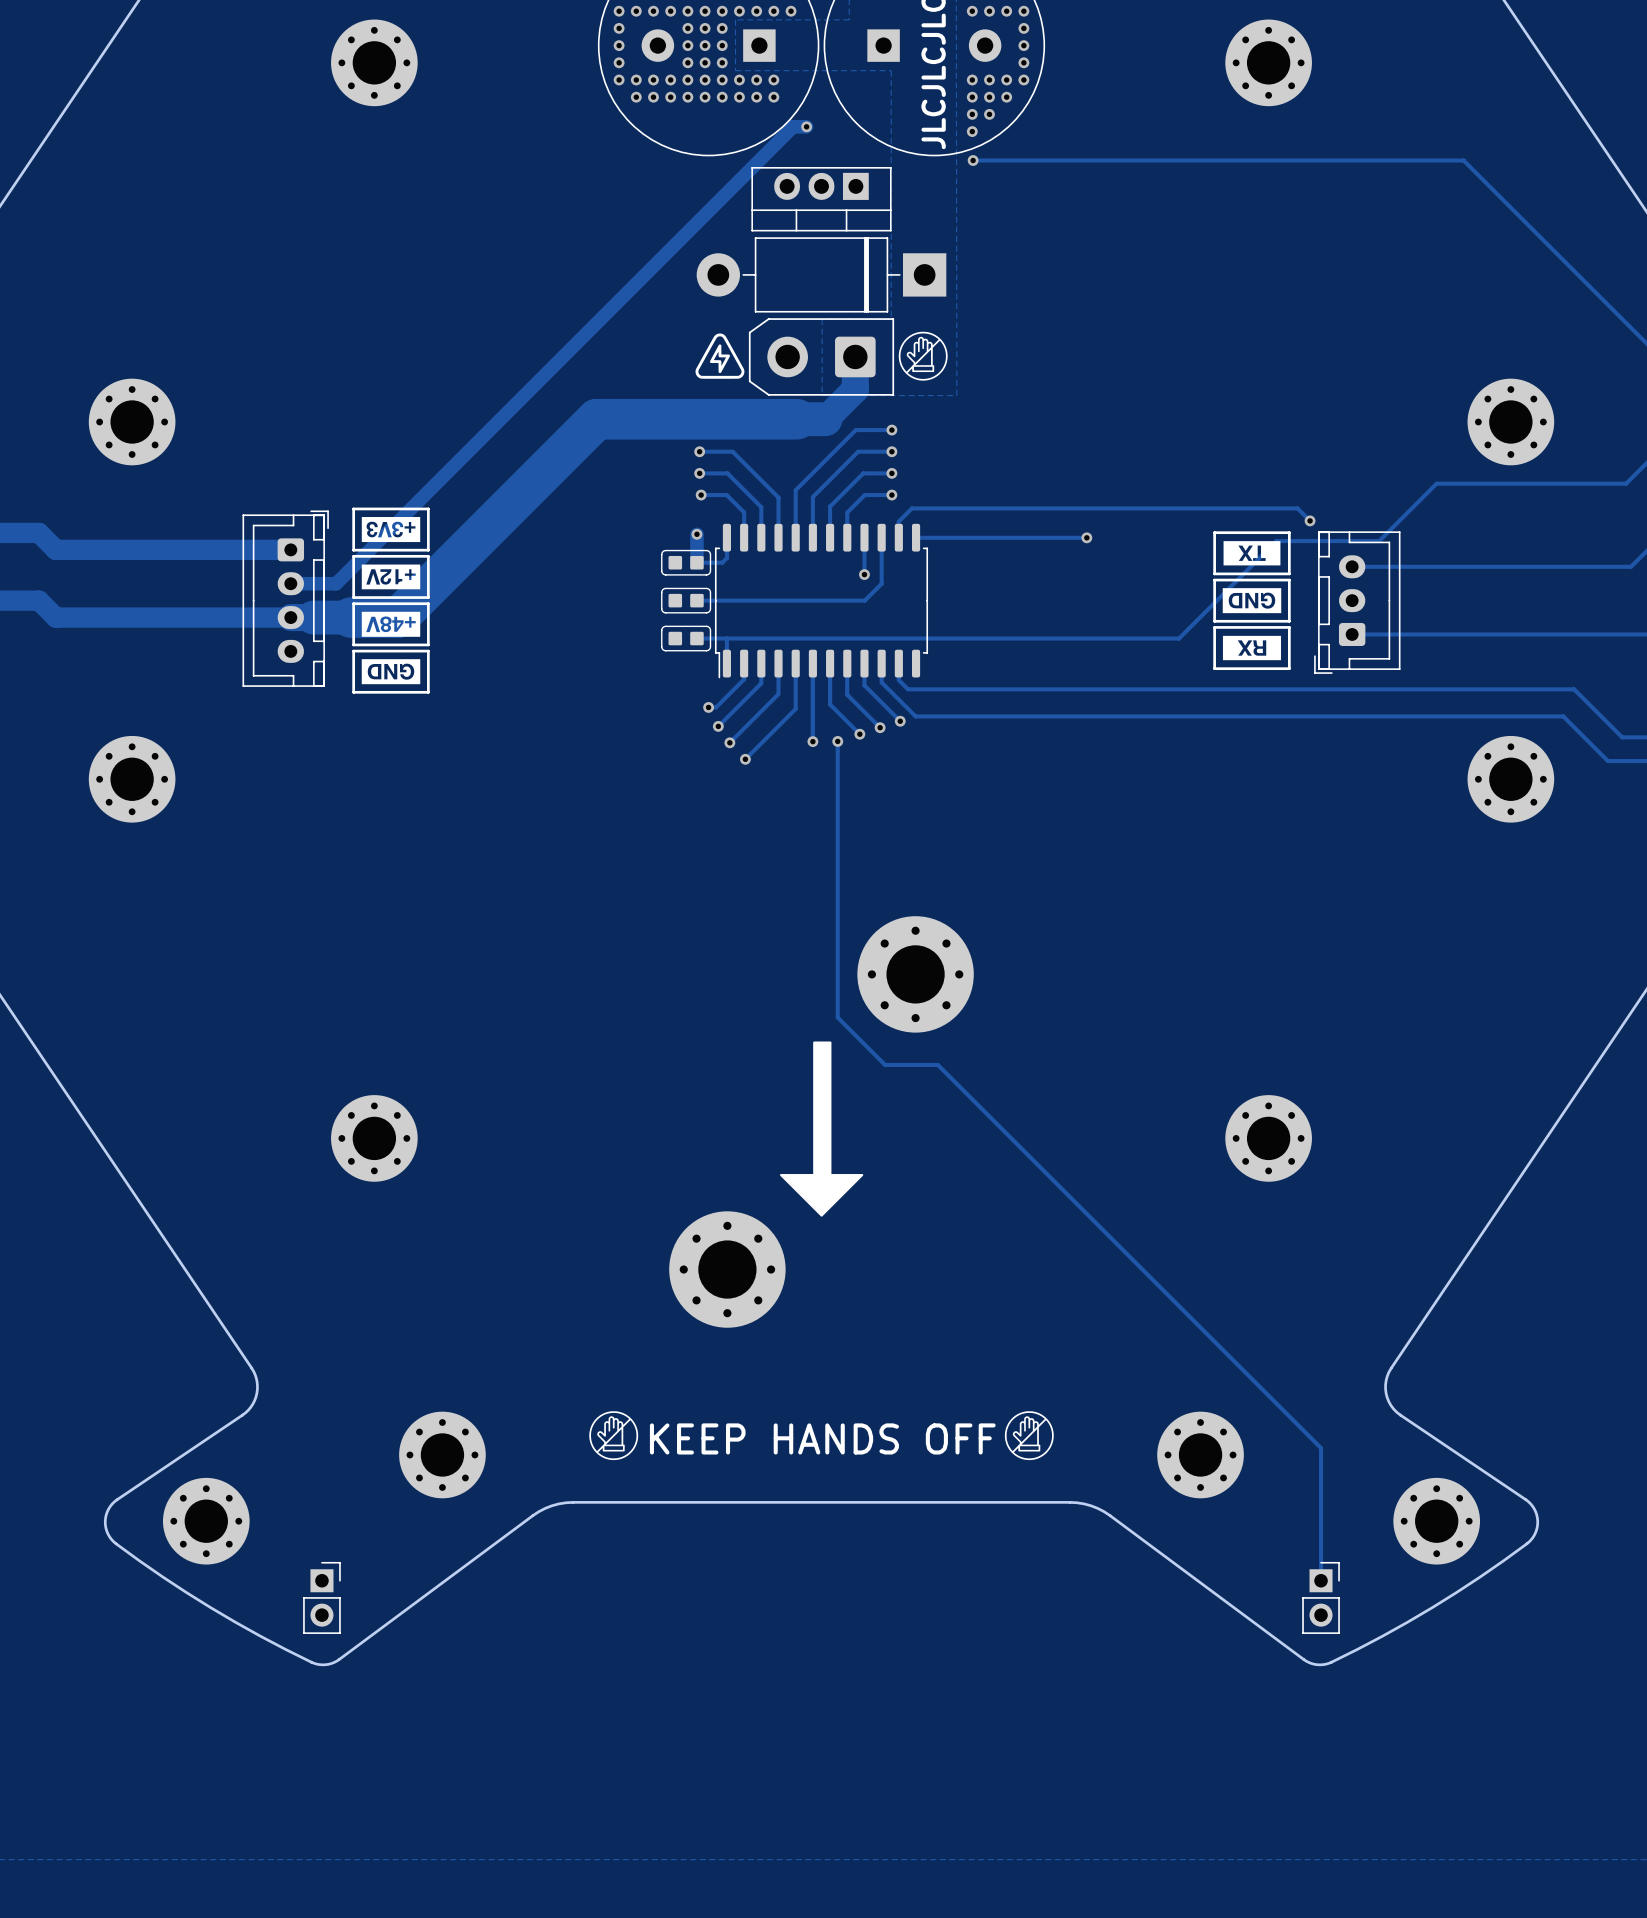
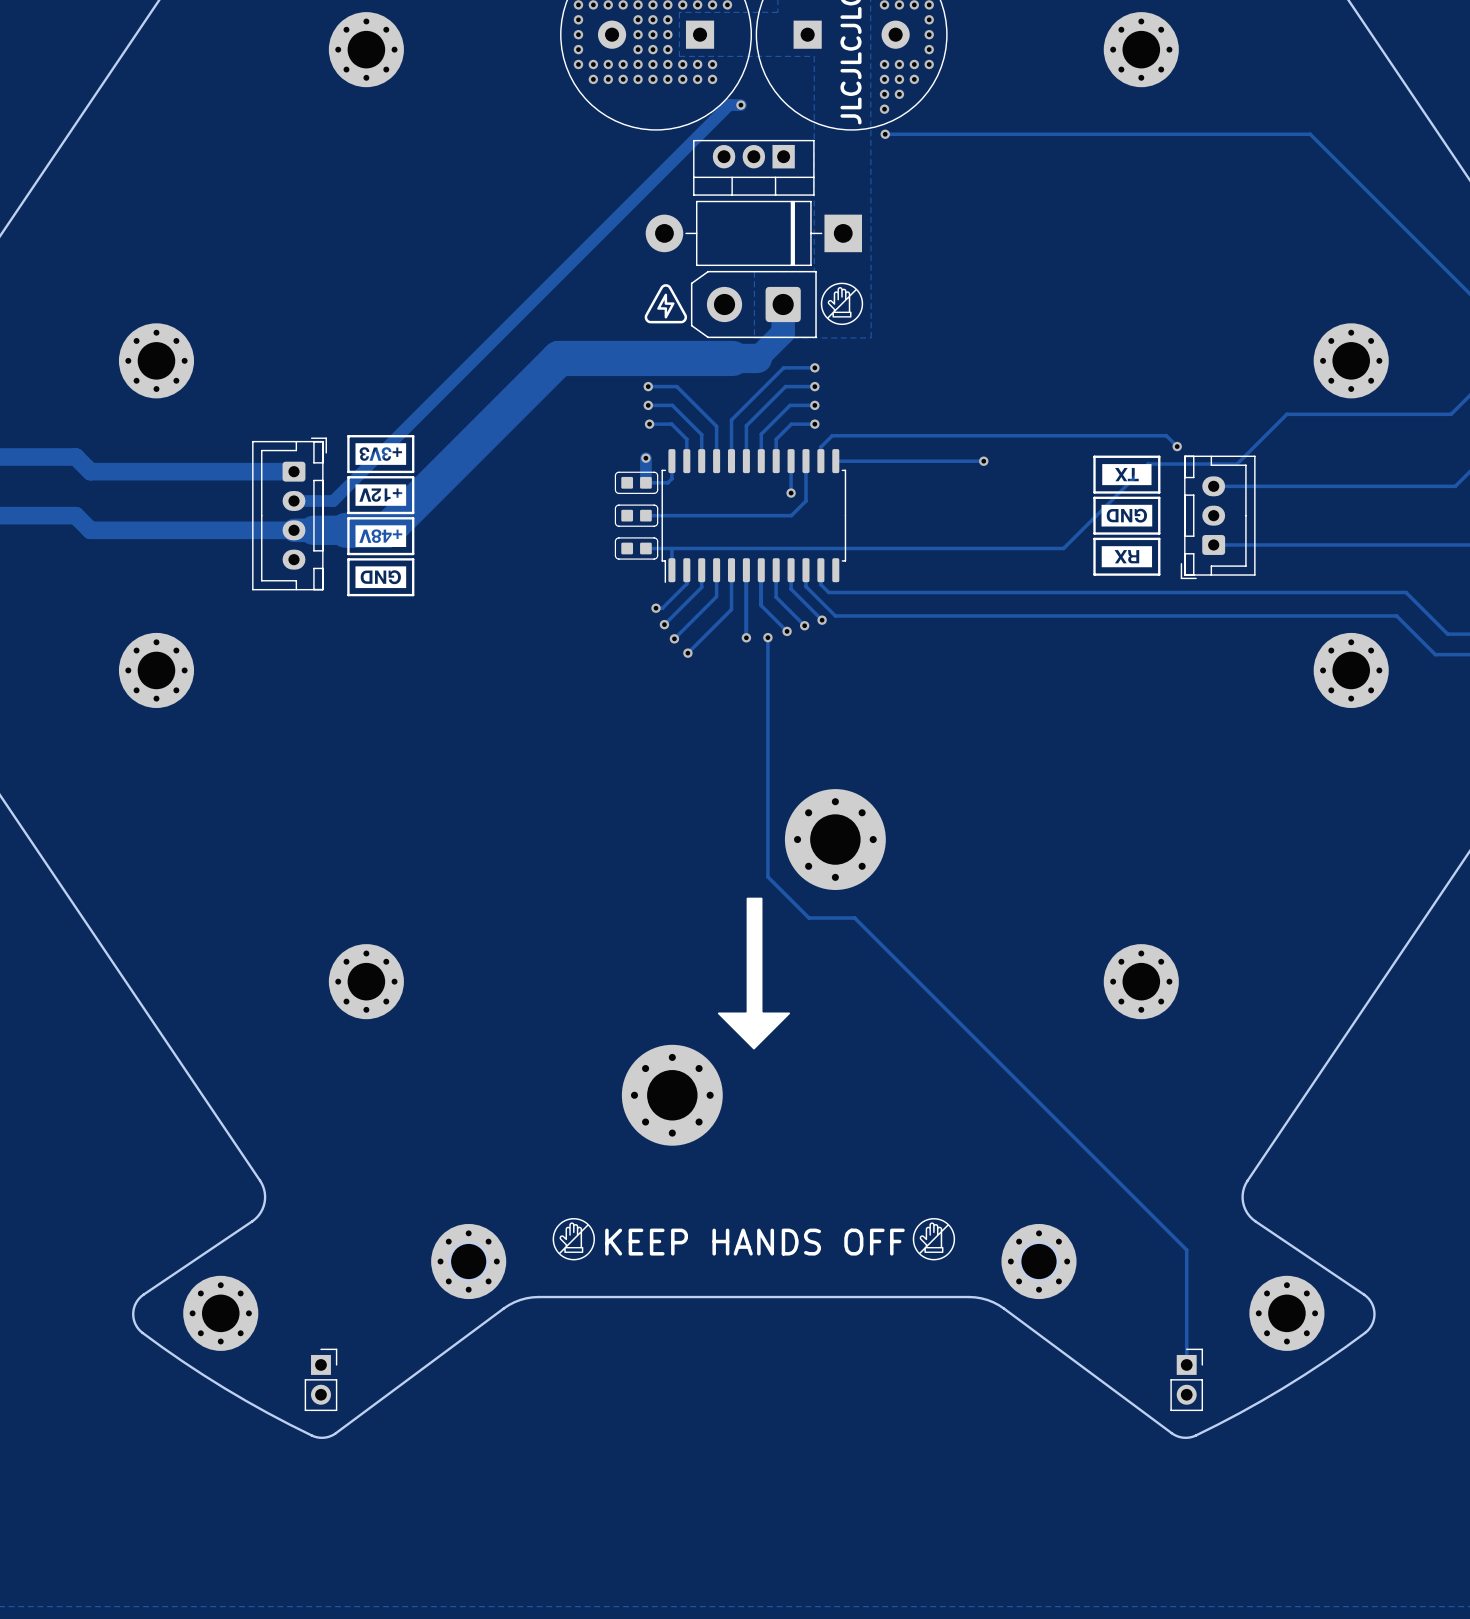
round board edge: none -> [448, 1241, 489, 1282]
round board edge: none -> [1019, 1241, 1059, 1282]
part position: (442, 1454) -> (468, 1261)
part position: (1200, 1454) -> (1039, 1261)

